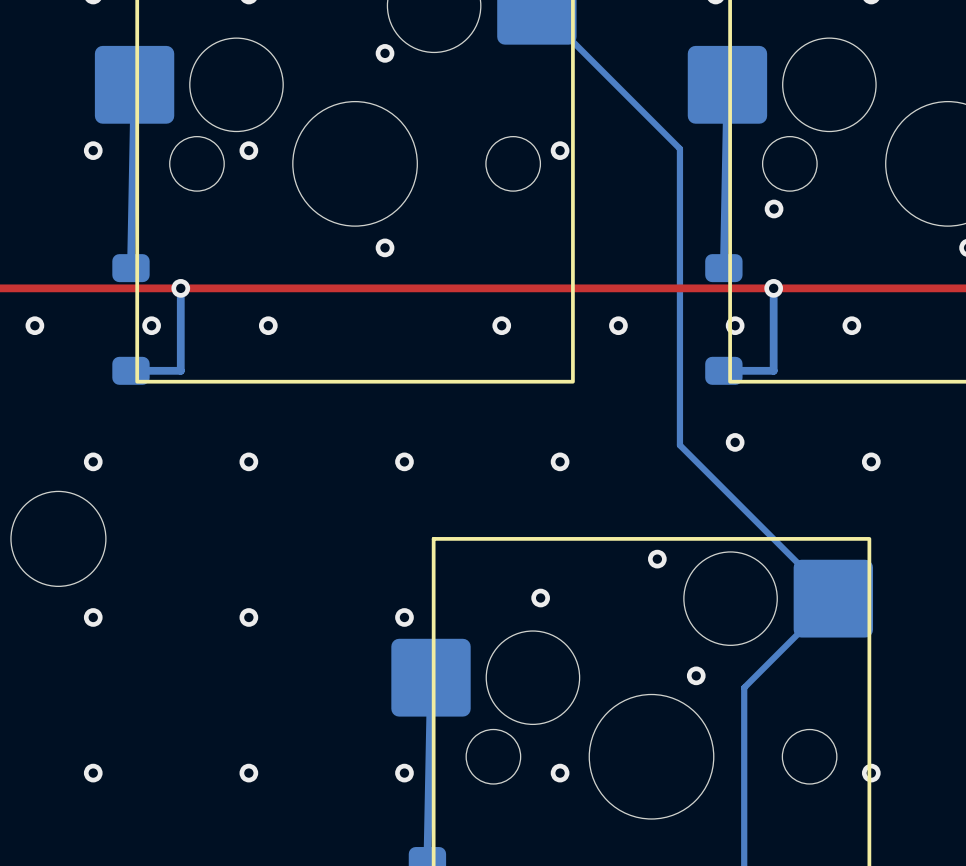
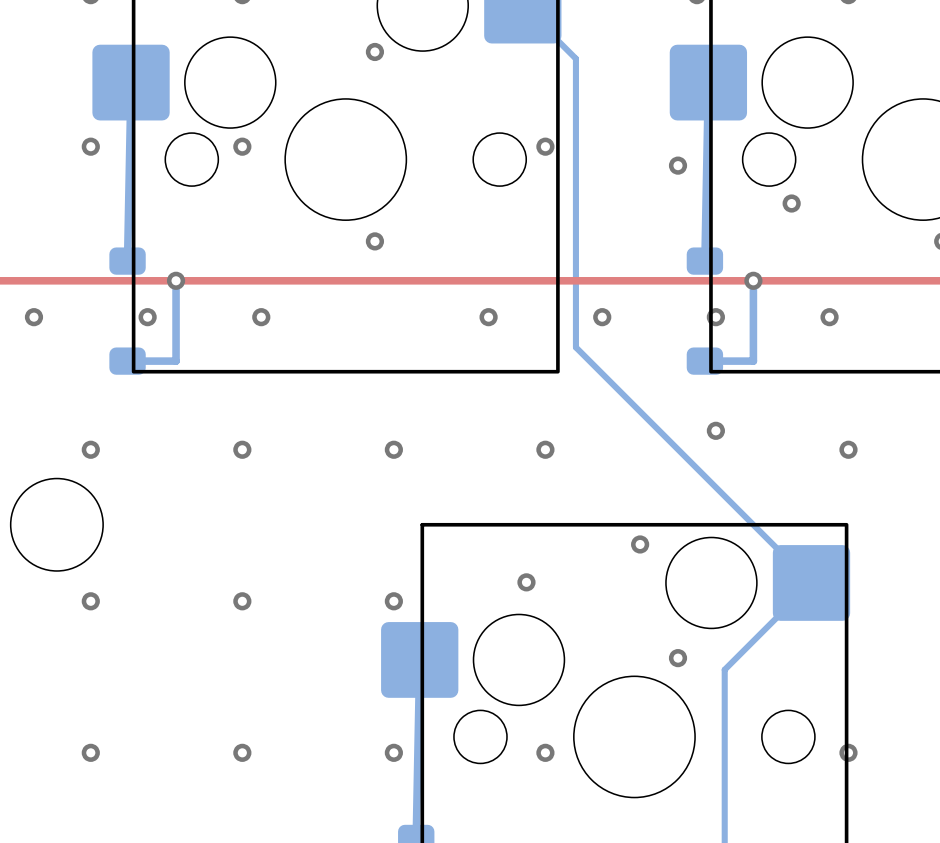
bottom track: (591, 60) (679, 148) (679, 445) -> (575, 58) (575, 347) (662, 433)
via: none -> (678, 165)
via position: (774, 208) -> (791, 203)

